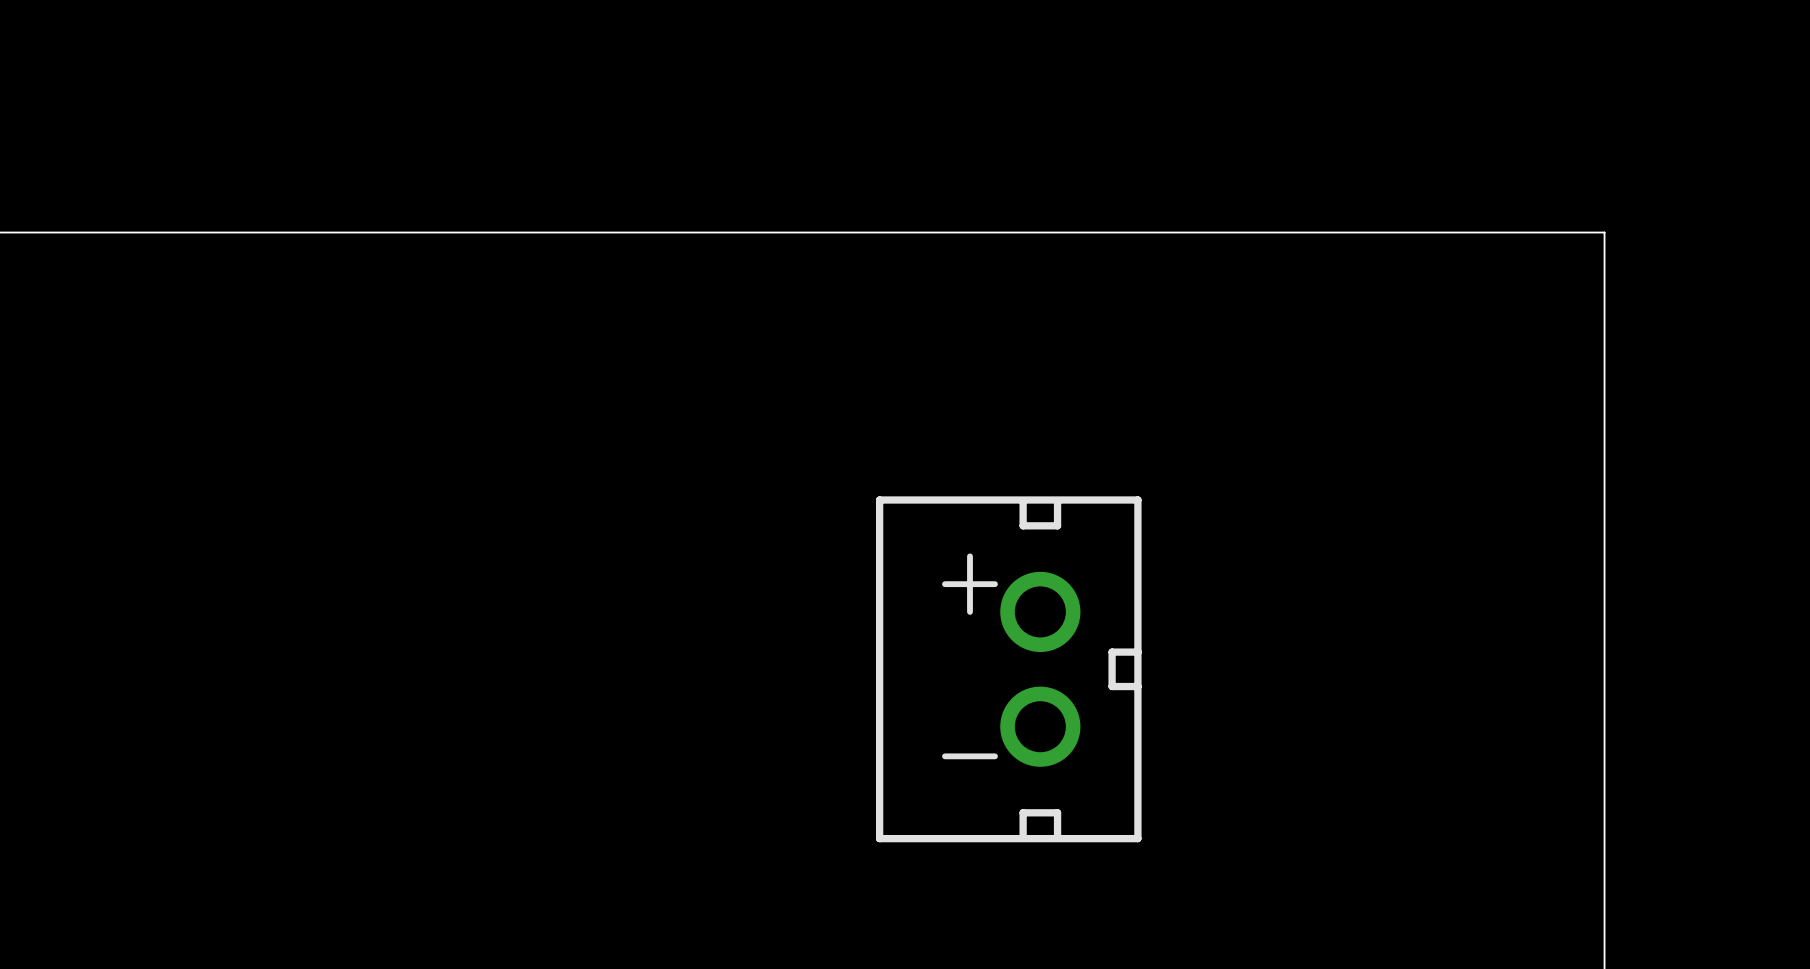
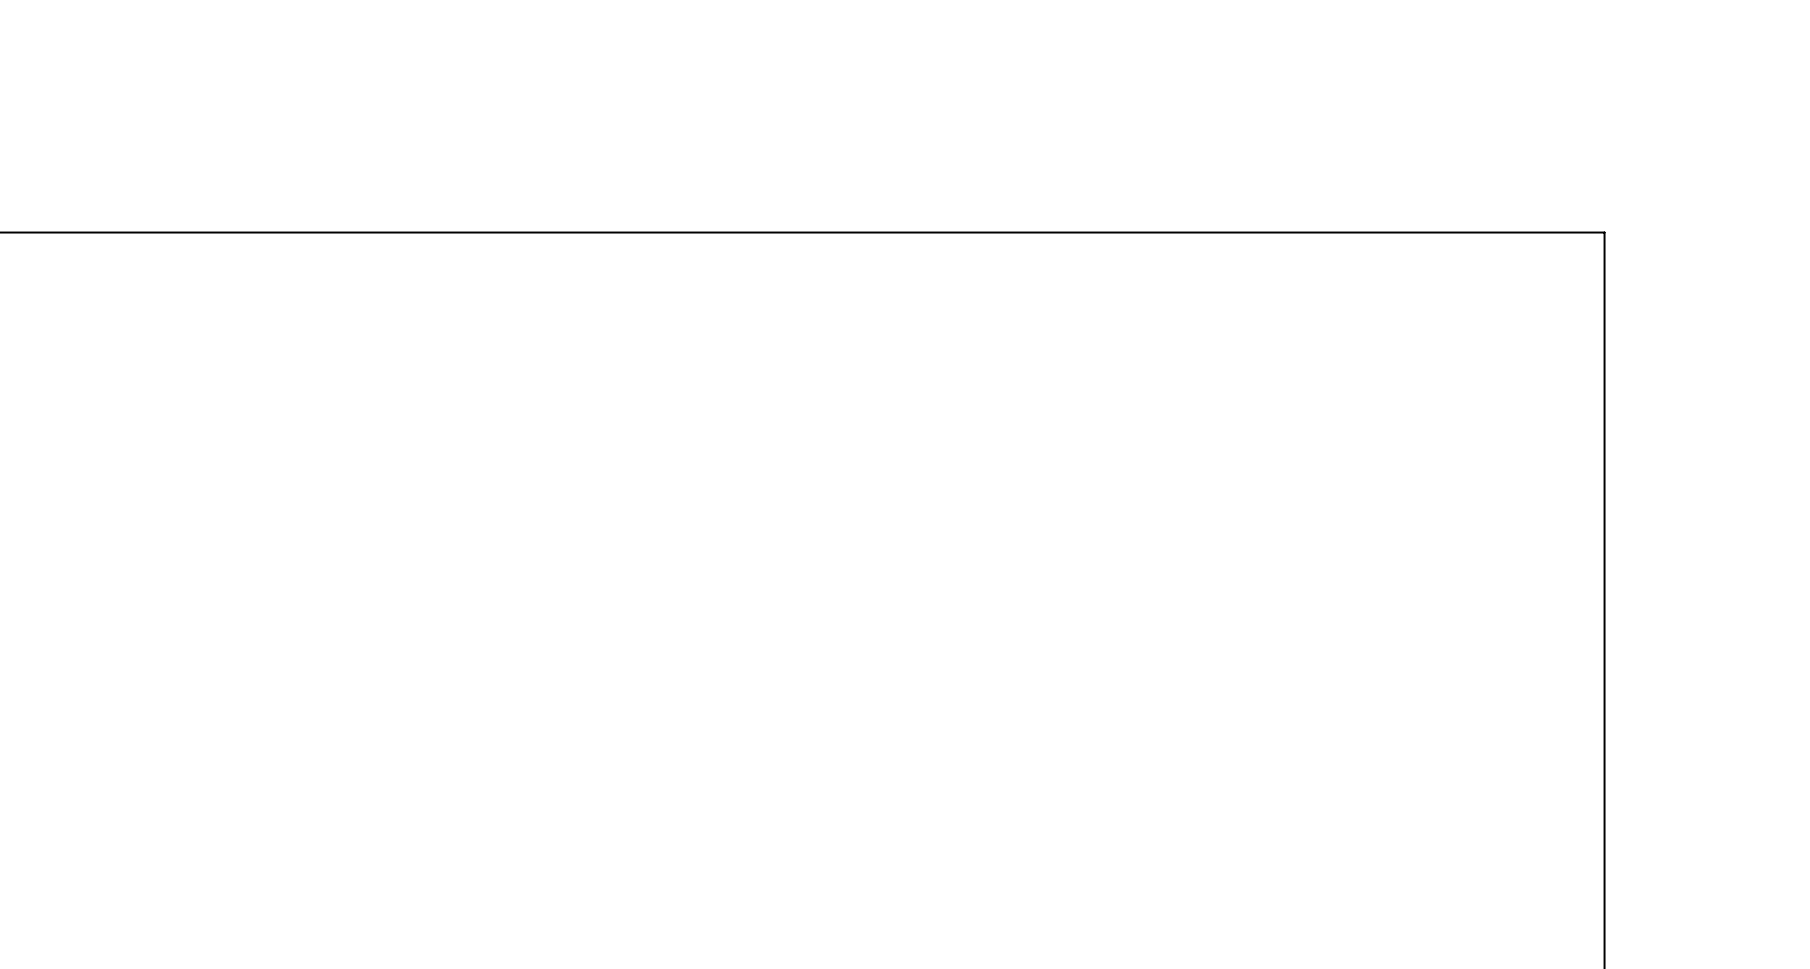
part: (1008, 669) -> none

